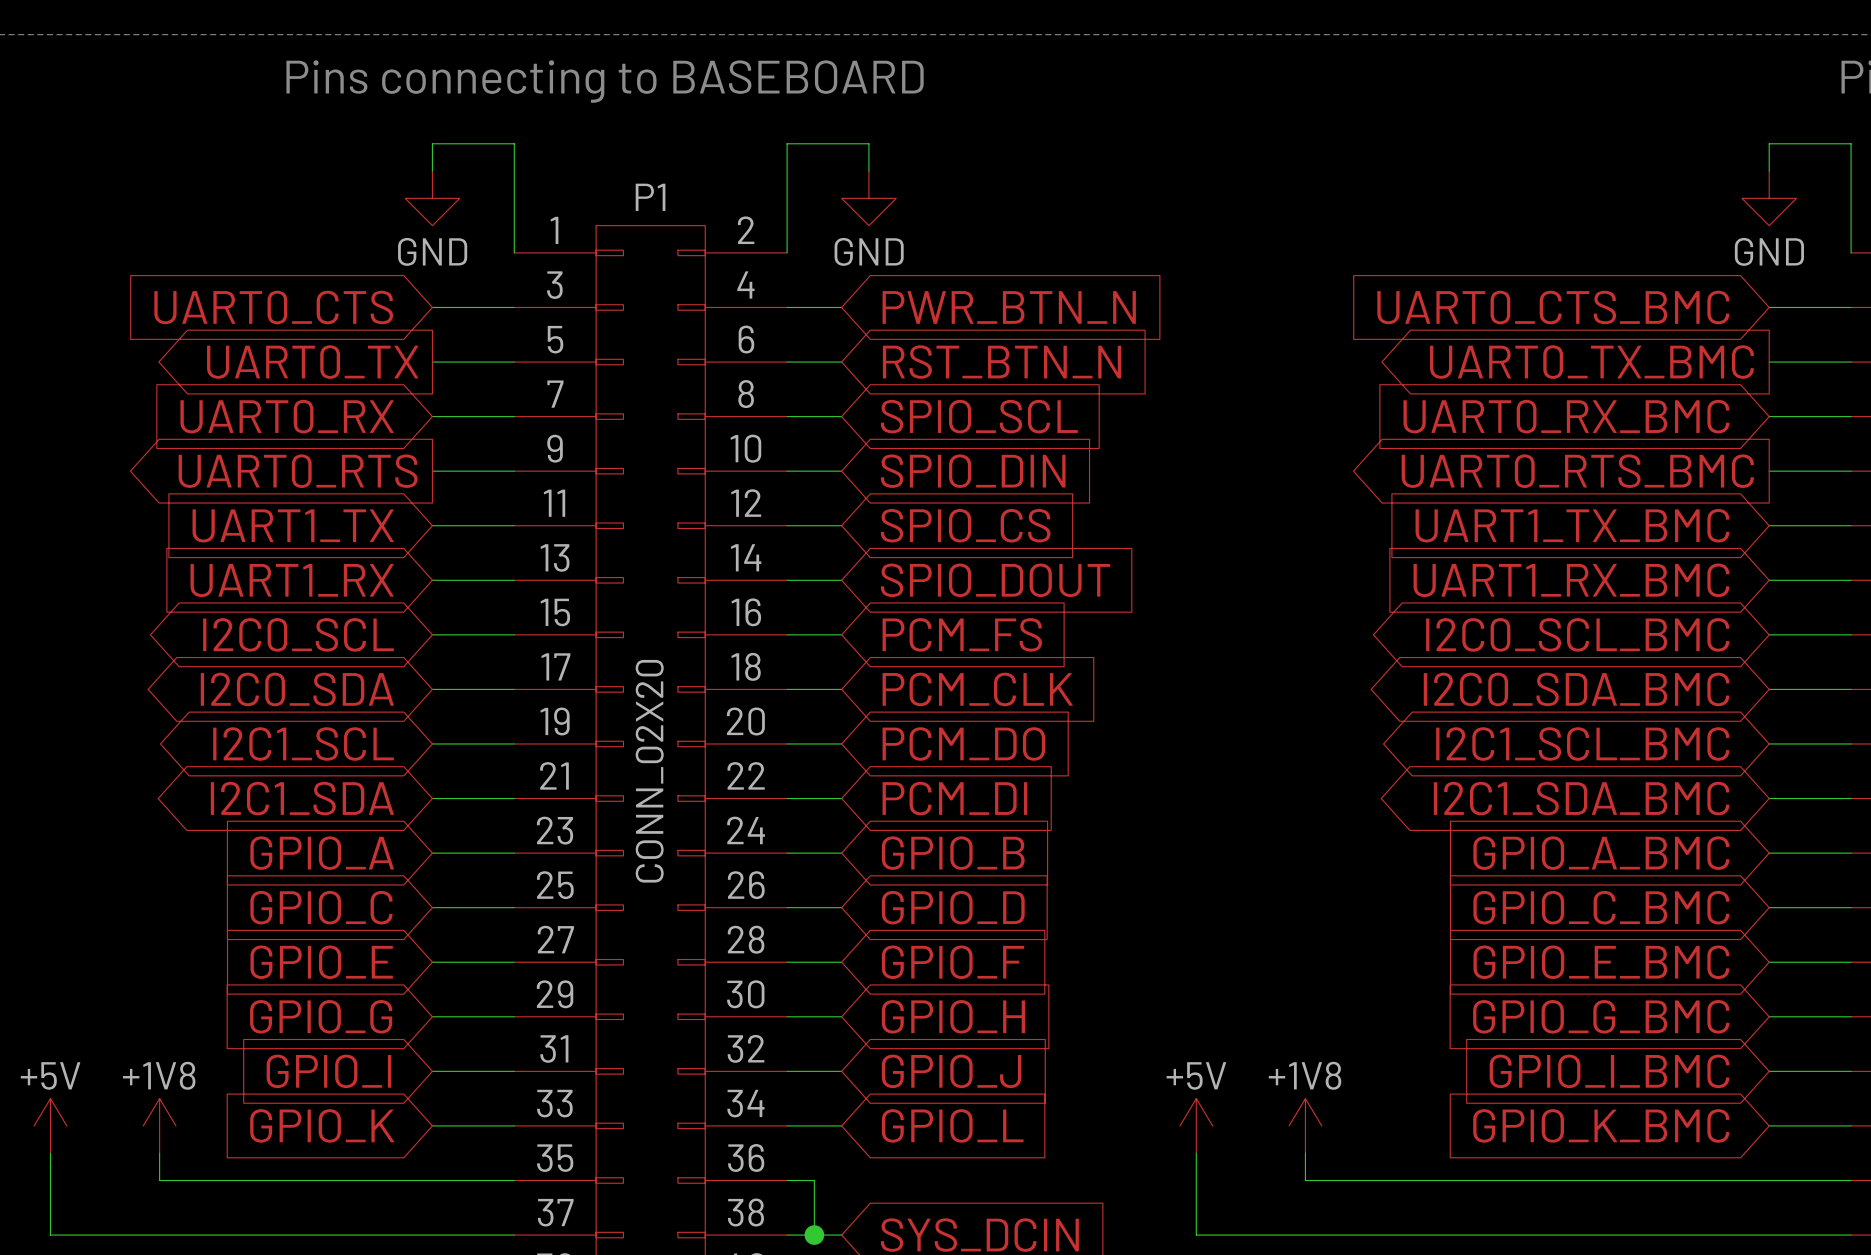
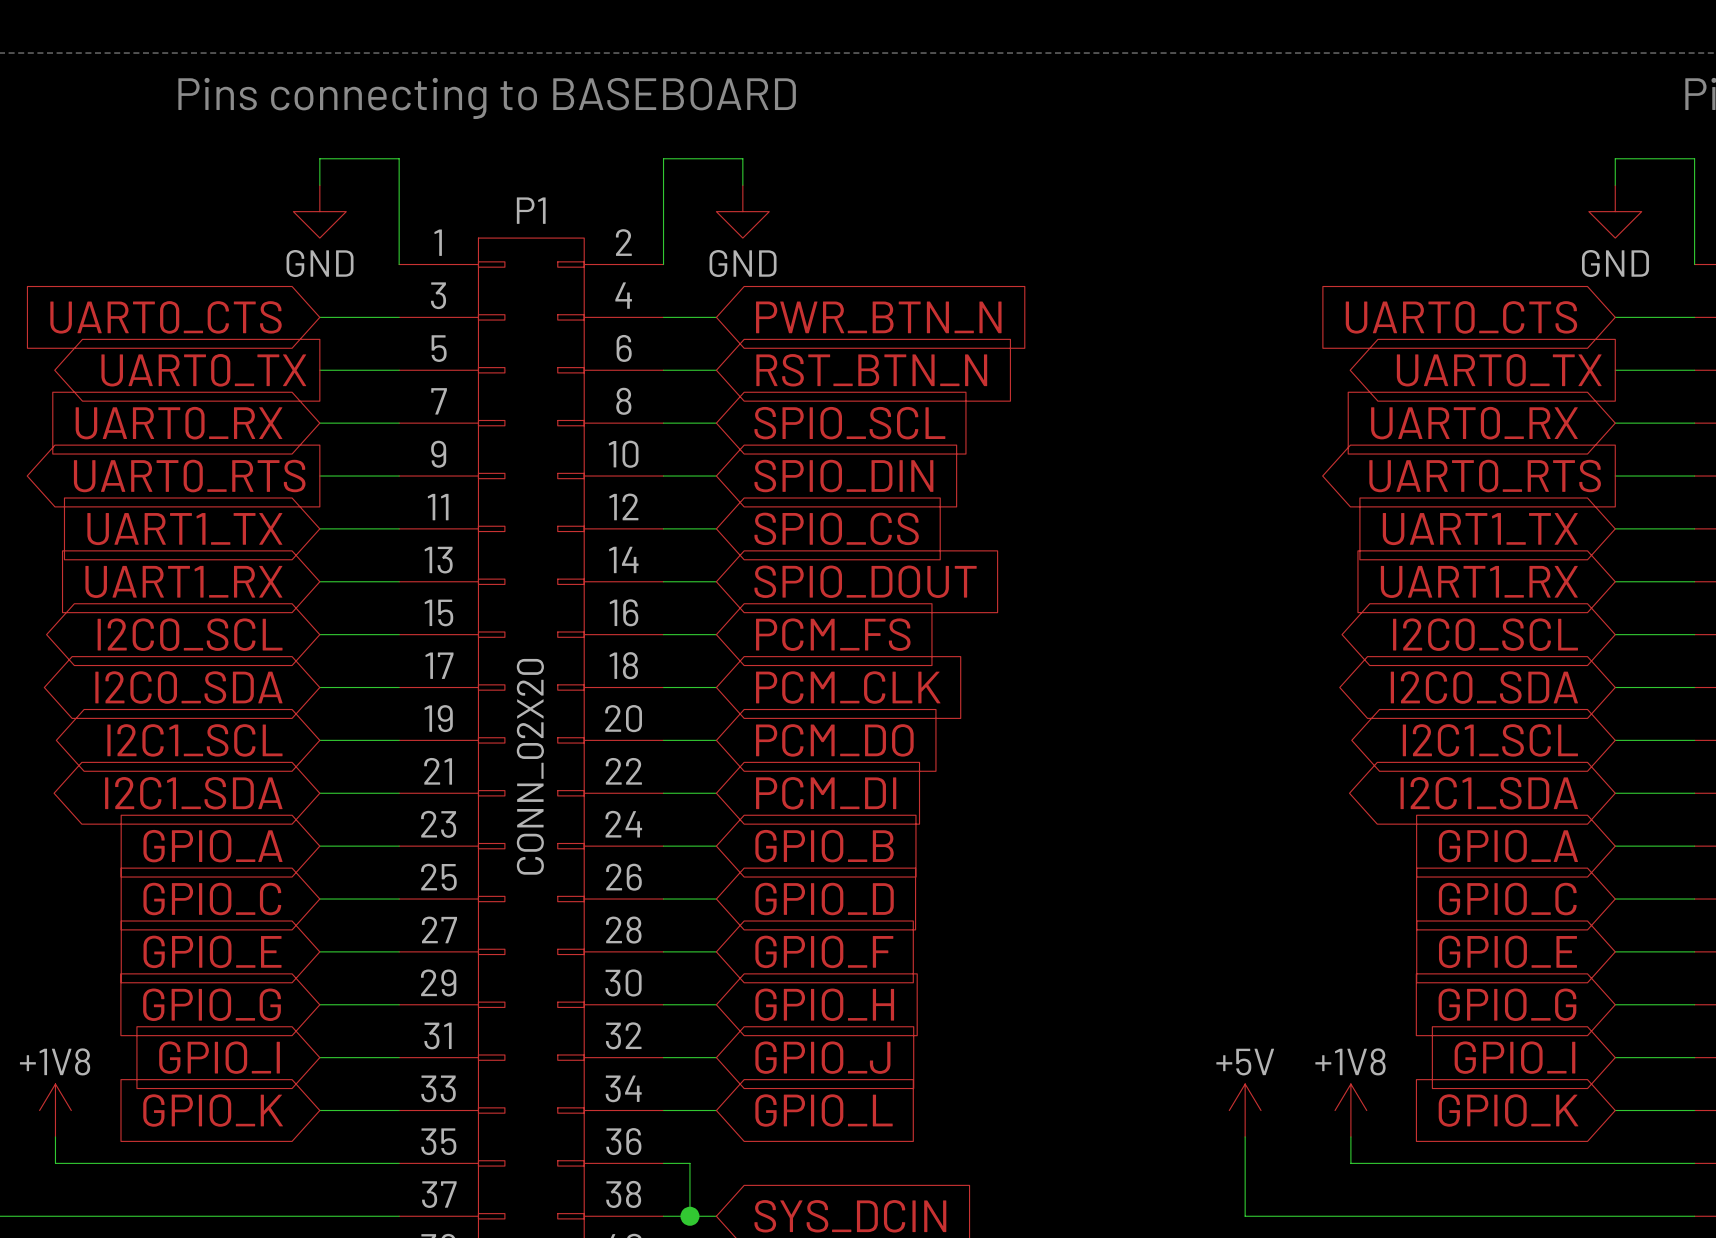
global label: UART0_CTS_BMC (1553, 307) -> UART0_CTS (1461, 317)
global label: UART0_TX_BMC (1591, 362) -> UART0_TX (1499, 370)
global label: UART0_RX_BMC (1566, 416) -> UART0_RX (1474, 423)
global label: UART0_RTS_BMC (1577, 471) -> UART0_RTS (1485, 476)
global label: UART1_TX_BMC (1572, 525) -> UART1_TX (1480, 529)
global label: UART1_RX_BMC (1571, 580) -> UART1_RX (1479, 581)
global label: I2C0_SCL_BMC (1577, 634) -> I2C0_SCL (1485, 634)
global label: I2C0_SDA_BMC (1576, 689) -> I2C0_SDA (1484, 687)
global label: I2C1_SCL_BMC (1582, 744) -> I2C1_SCL (1490, 740)
global label: I2C1_SDA_BMC (1581, 798) -> I2C1_SDA (1489, 793)
global label: GPIO_A_BMC (1601, 853) -> GPIO_A (1508, 846)
global label: GPIO_C_BMC (1601, 907) -> GPIO_C (1507, 899)
global label: GPIO_E_BMC (1601, 962) -> GPIO_E (1507, 951)
global label: GPIO_G_BMC (1601, 1016) -> GPIO_G (1507, 1004)
global label: GPIO_I_BMC (1609, 1071) -> GPIO_I (1514, 1057)
power symbol position: +5V (1196, 1125) -> +5V (1245, 1110)
power symbol position: +1V8 (1305, 1125) -> +1V8 (1350, 1110)
global label: GPIO_K_BMC (1601, 1125) -> GPIO_K (1508, 1110)
wire: (1196, 1153) (1196, 1235) (1387, 1235) -> (1245, 1136) (1245, 1216)
wire: (1305, 1153) (1305, 1180) (1496, 1180) -> (1350, 1136) (1350, 1163)

